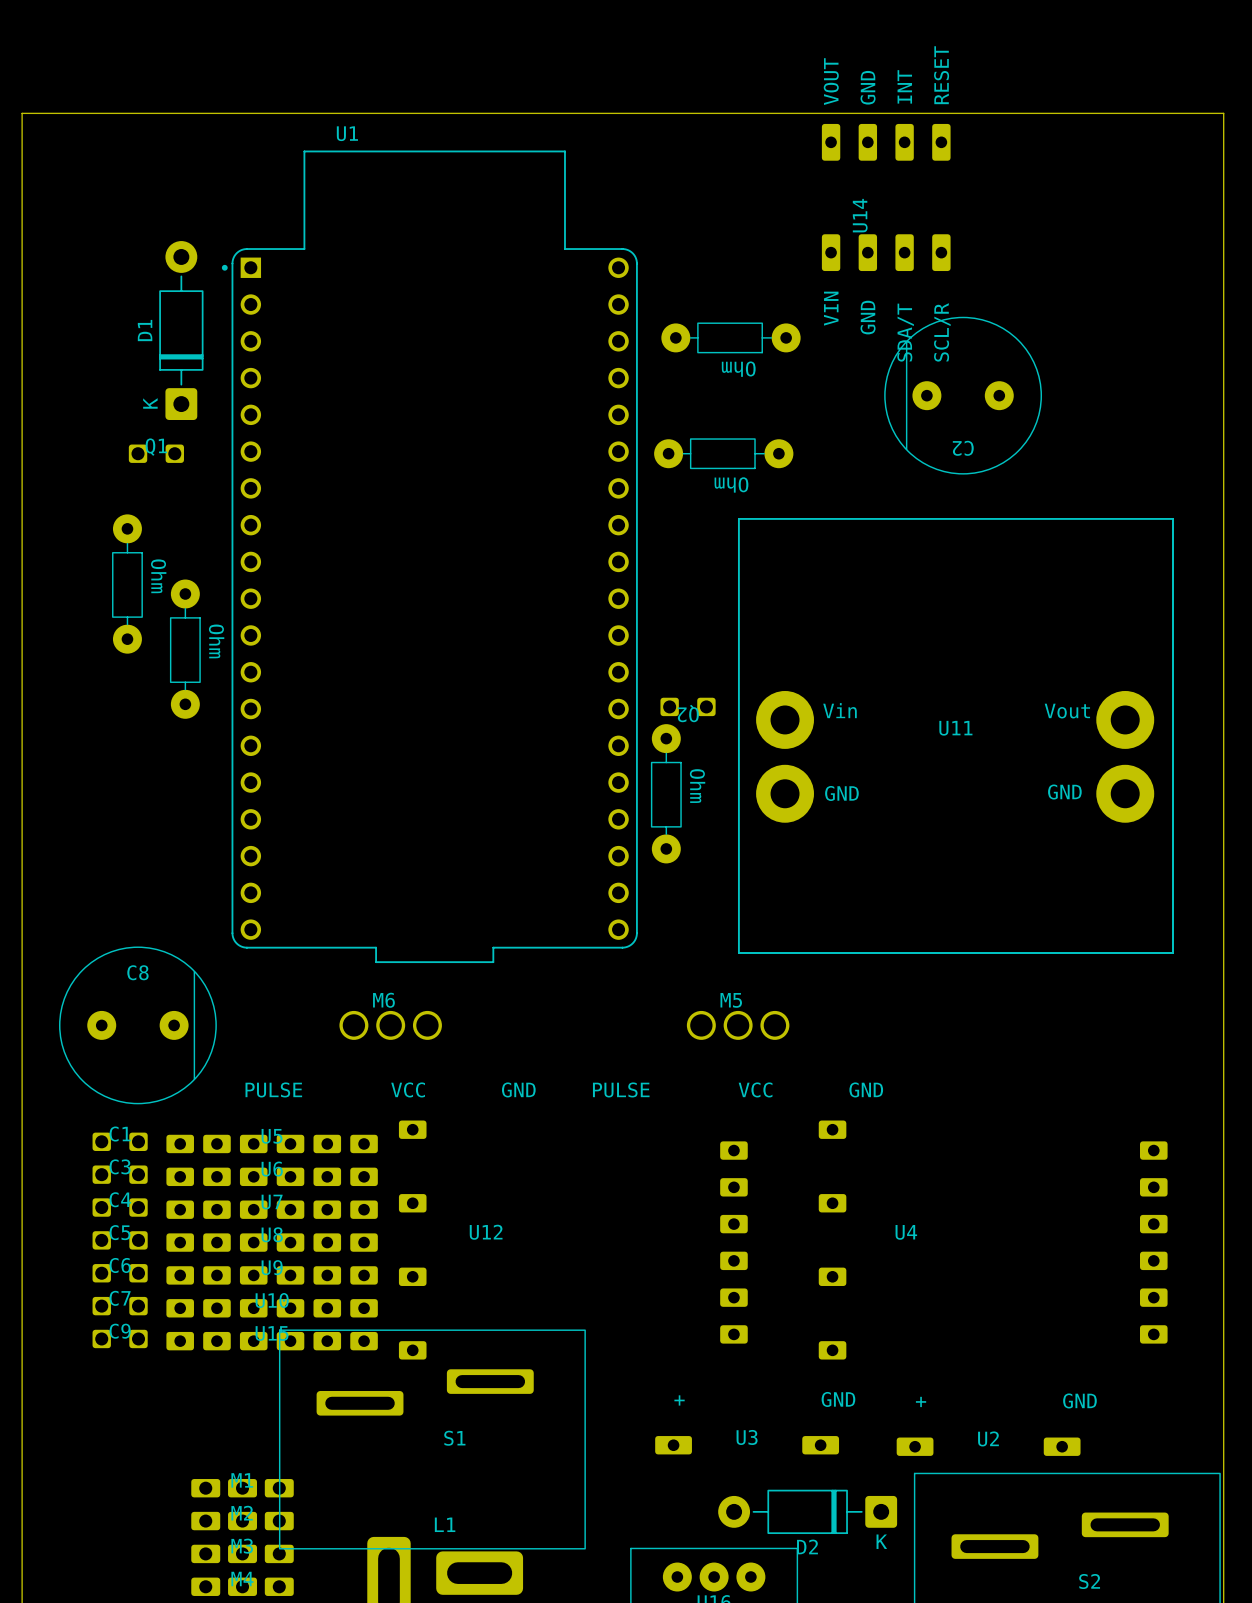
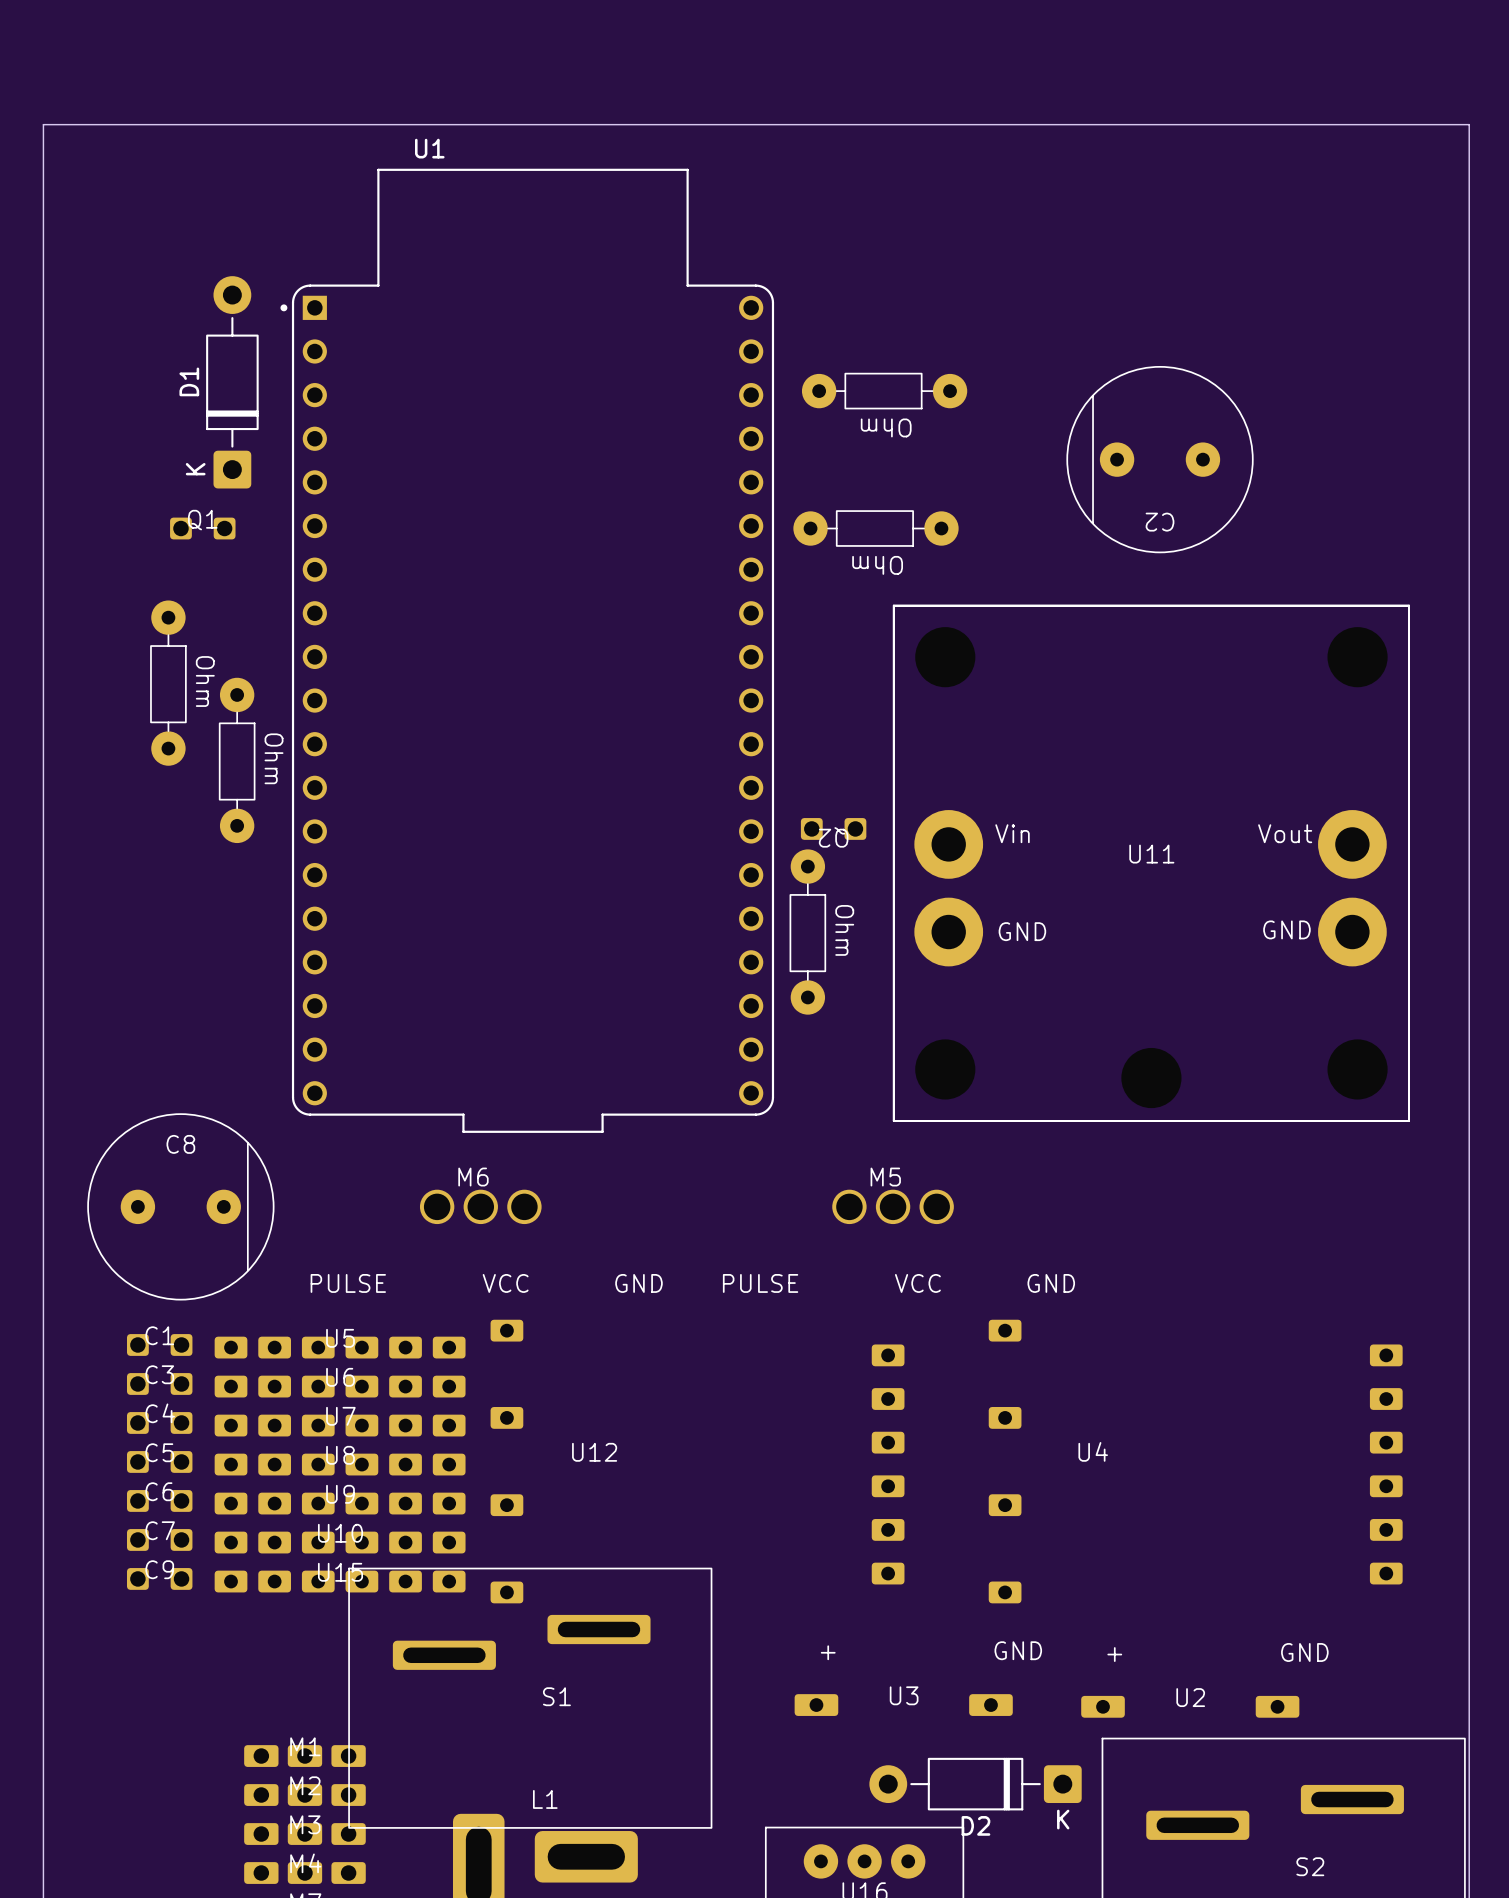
U14: (886, 197) -> none

